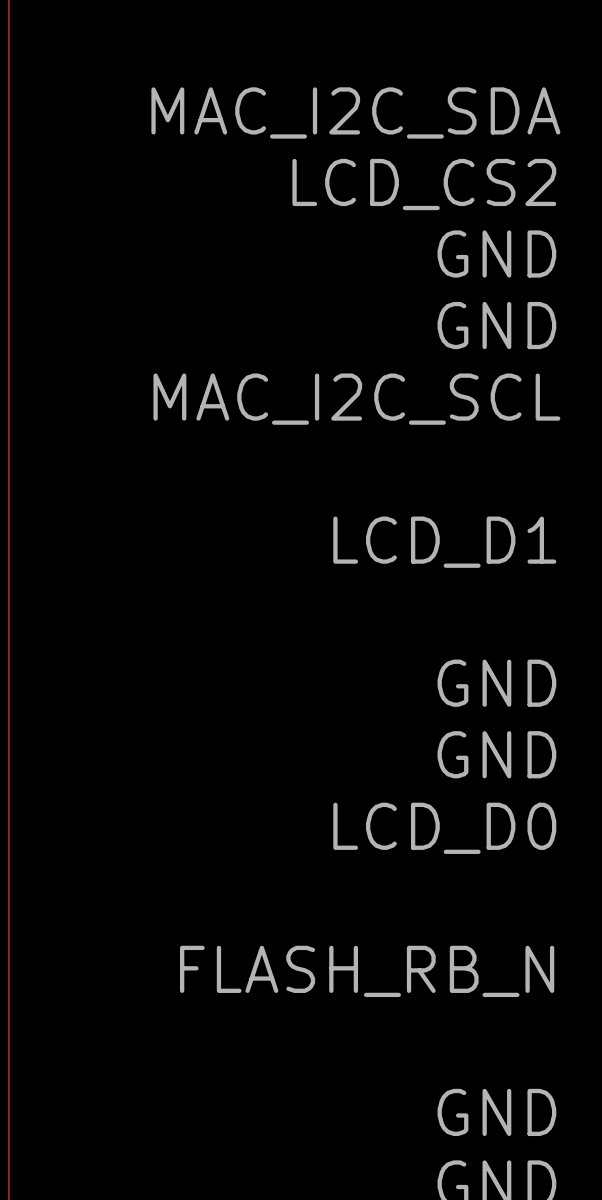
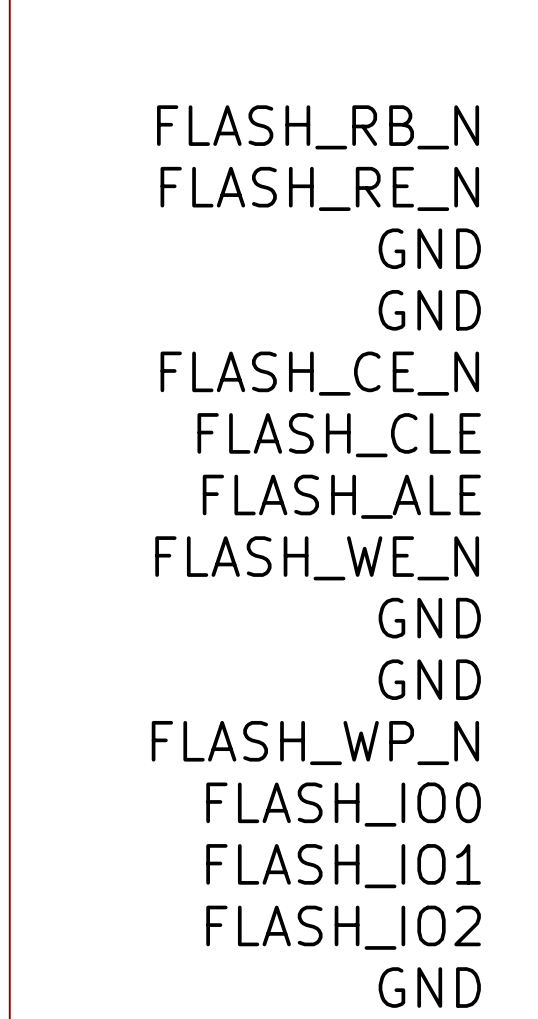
label: MAC_I2C_SDA (355, 112) -> FLASH_RB_N (318, 127)
label: LCD_CS2 (424, 184) -> FLASH_RE_N (319, 188)
label: MAC_I2C_SCL (356, 399) -> FLASH_CE_N (319, 373)
label: none -> FLASH_CLE (339, 435)
label: LCD_D1 (444, 542) -> FLASH_ALE (341, 496)
label: none -> FLASH_WE_N (317, 558)
label: LCD_D0 (444, 828) -> FLASH_WP_N (315, 743)
label: none -> FLASH_IO0 (343, 804)
label: FLASH_RB_N (367, 971) -> FLASH_IO1 (343, 866)
label: none -> FLASH_IO2 (343, 927)

